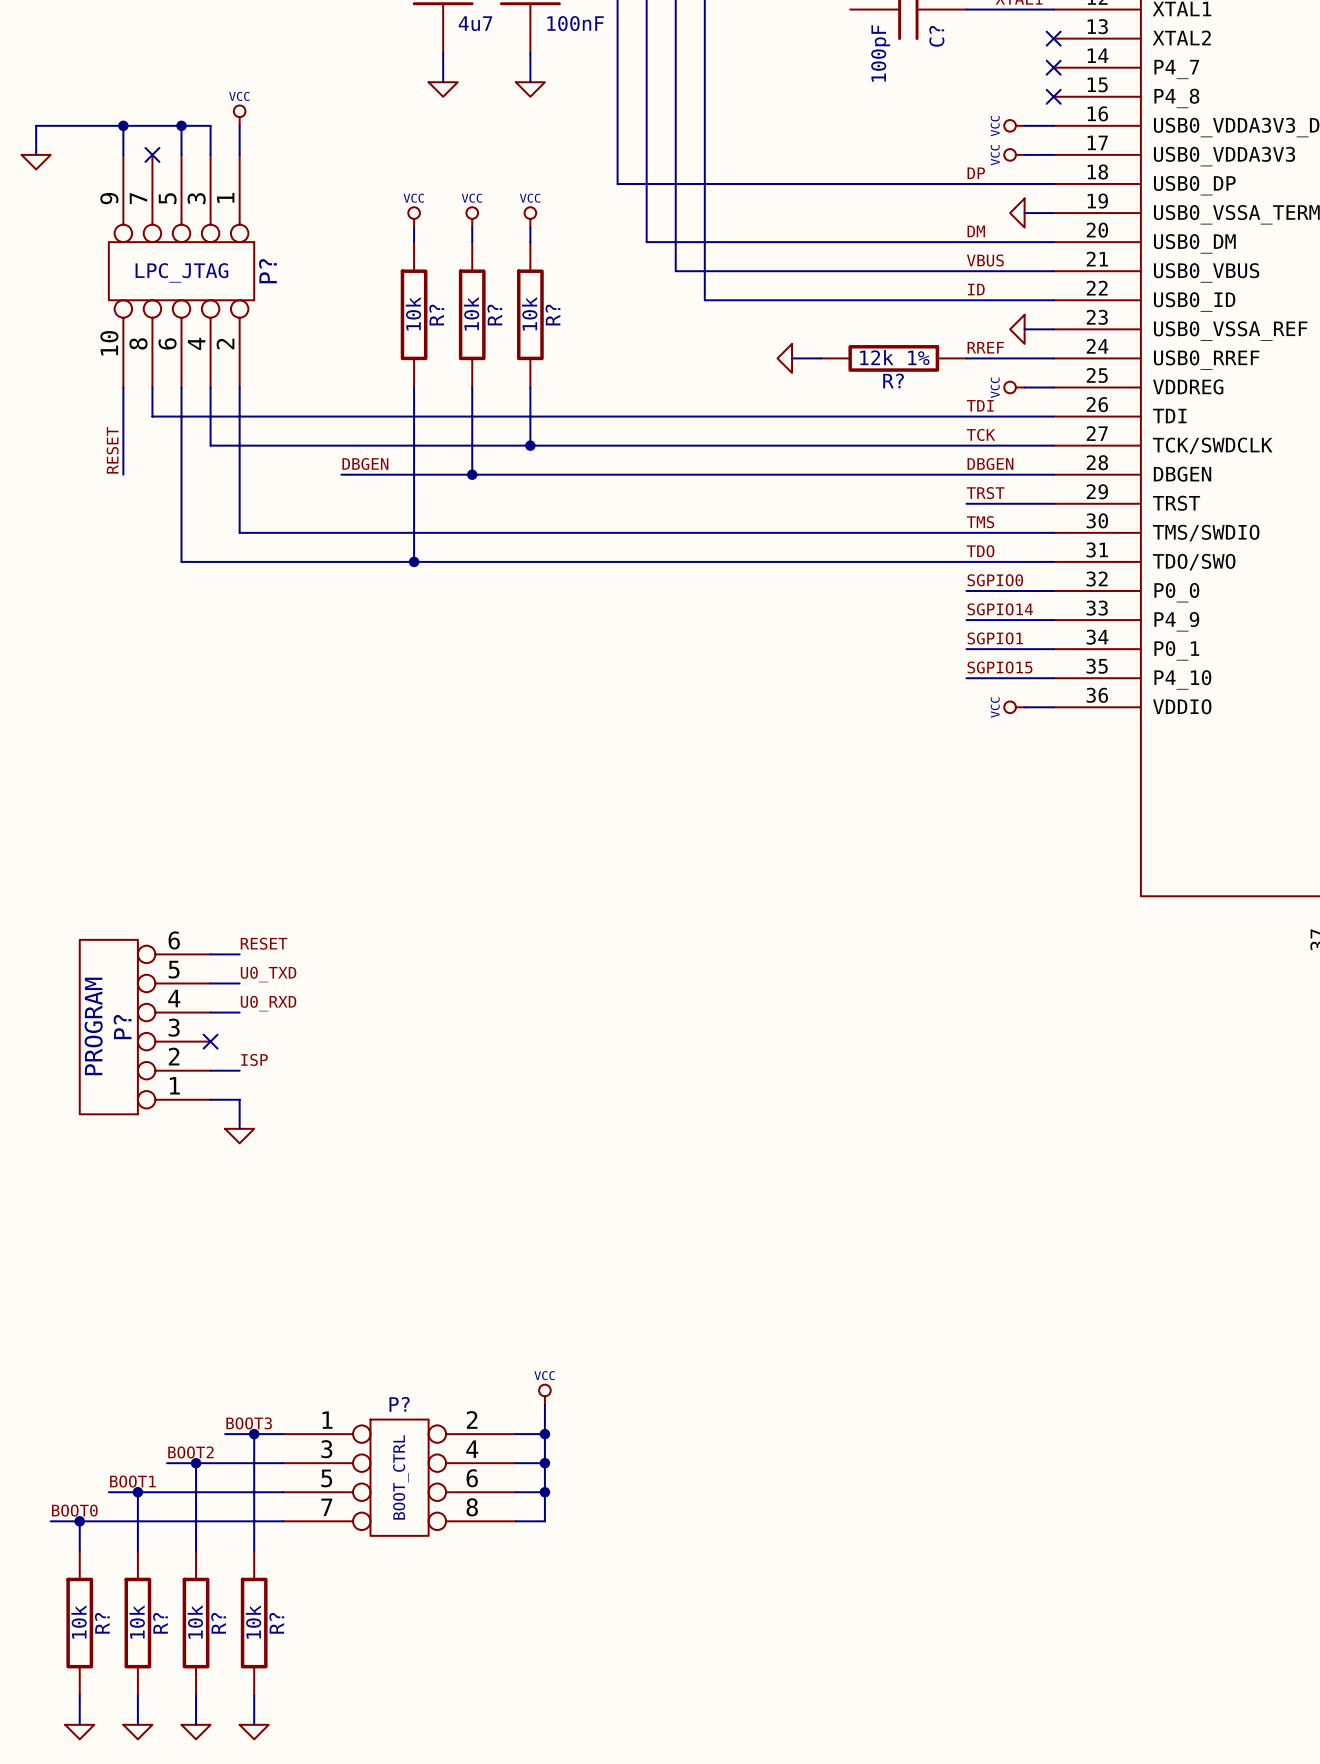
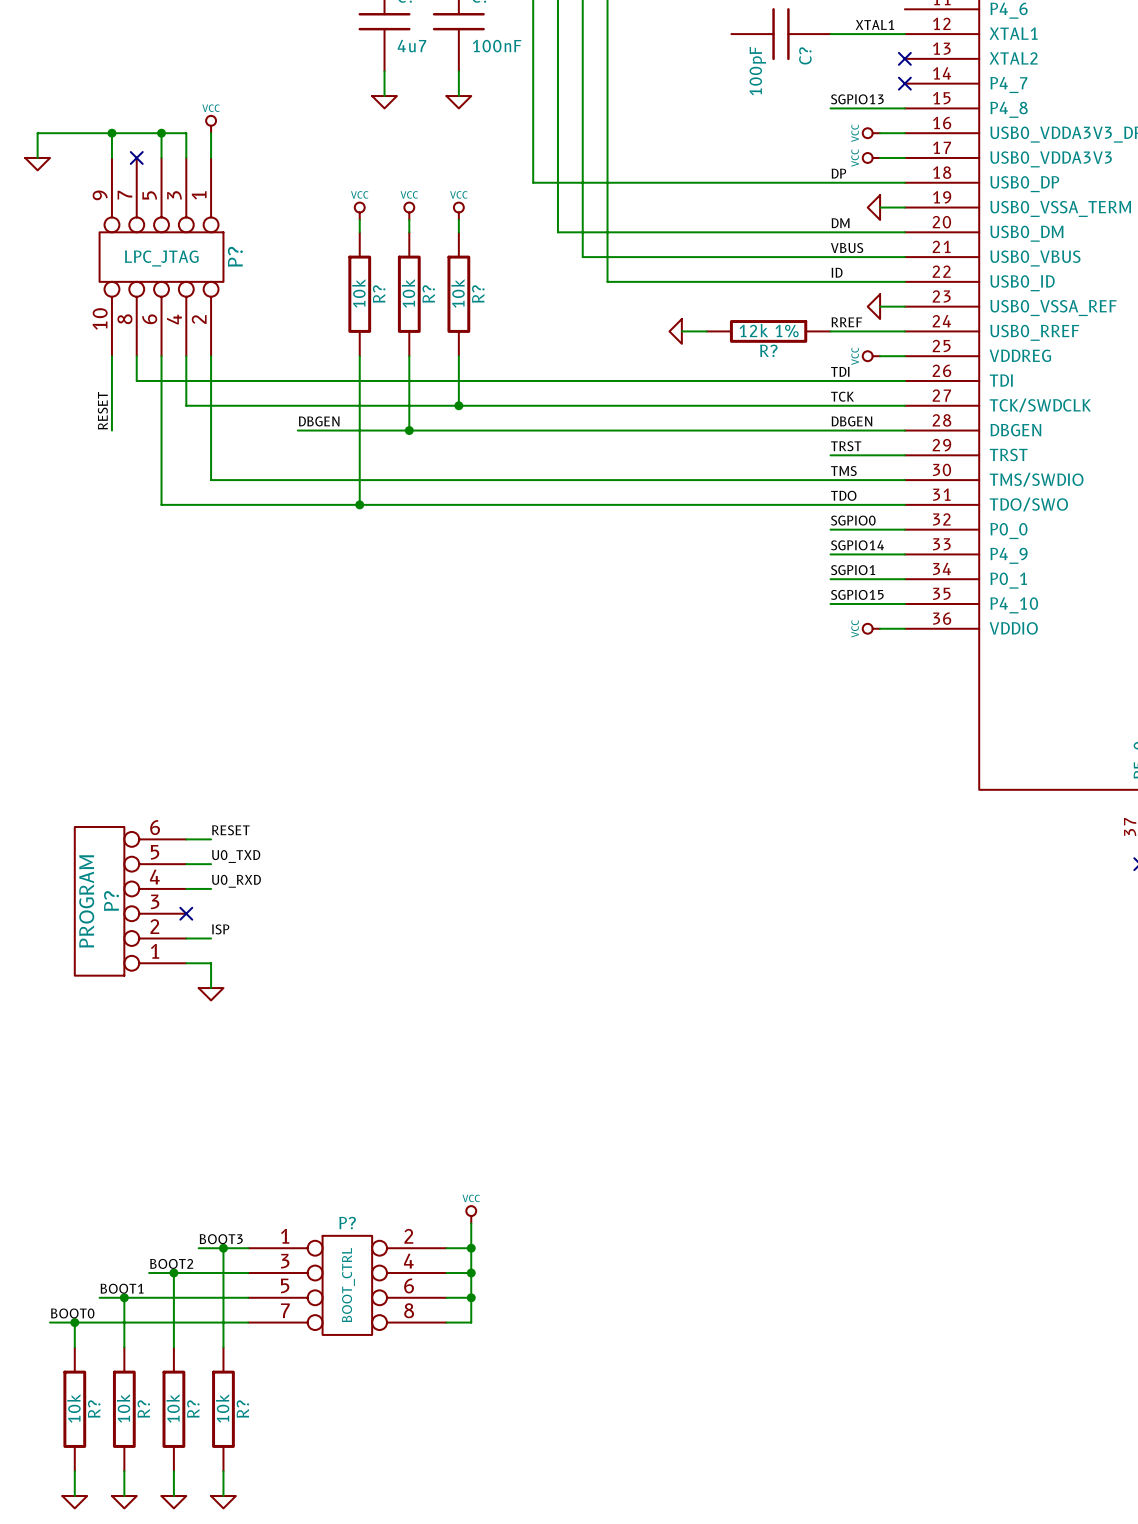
label: none -> SGPIO13 (857, 99)
wire: none -> (830, 108) (904, 108)
no-connect mark: (1053, 96) -> none

